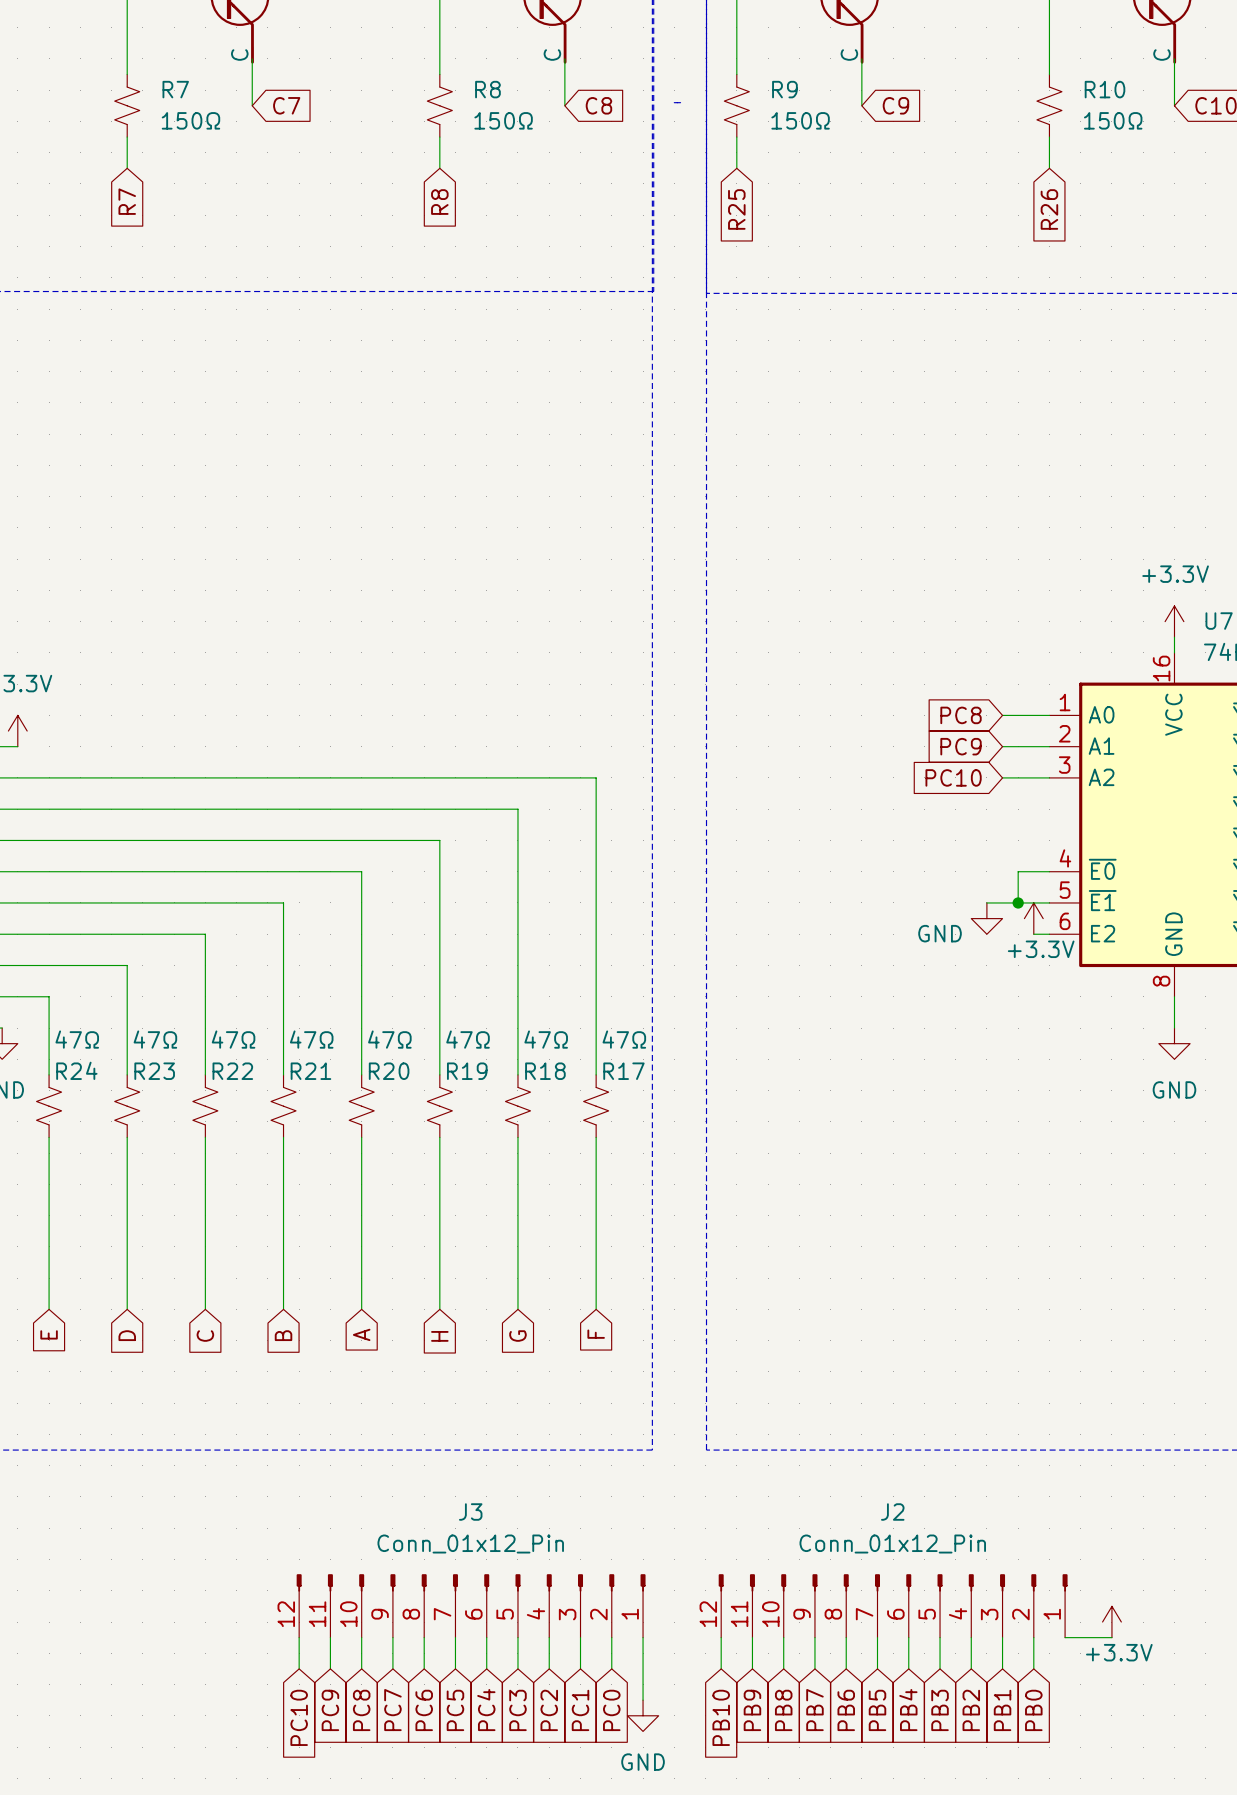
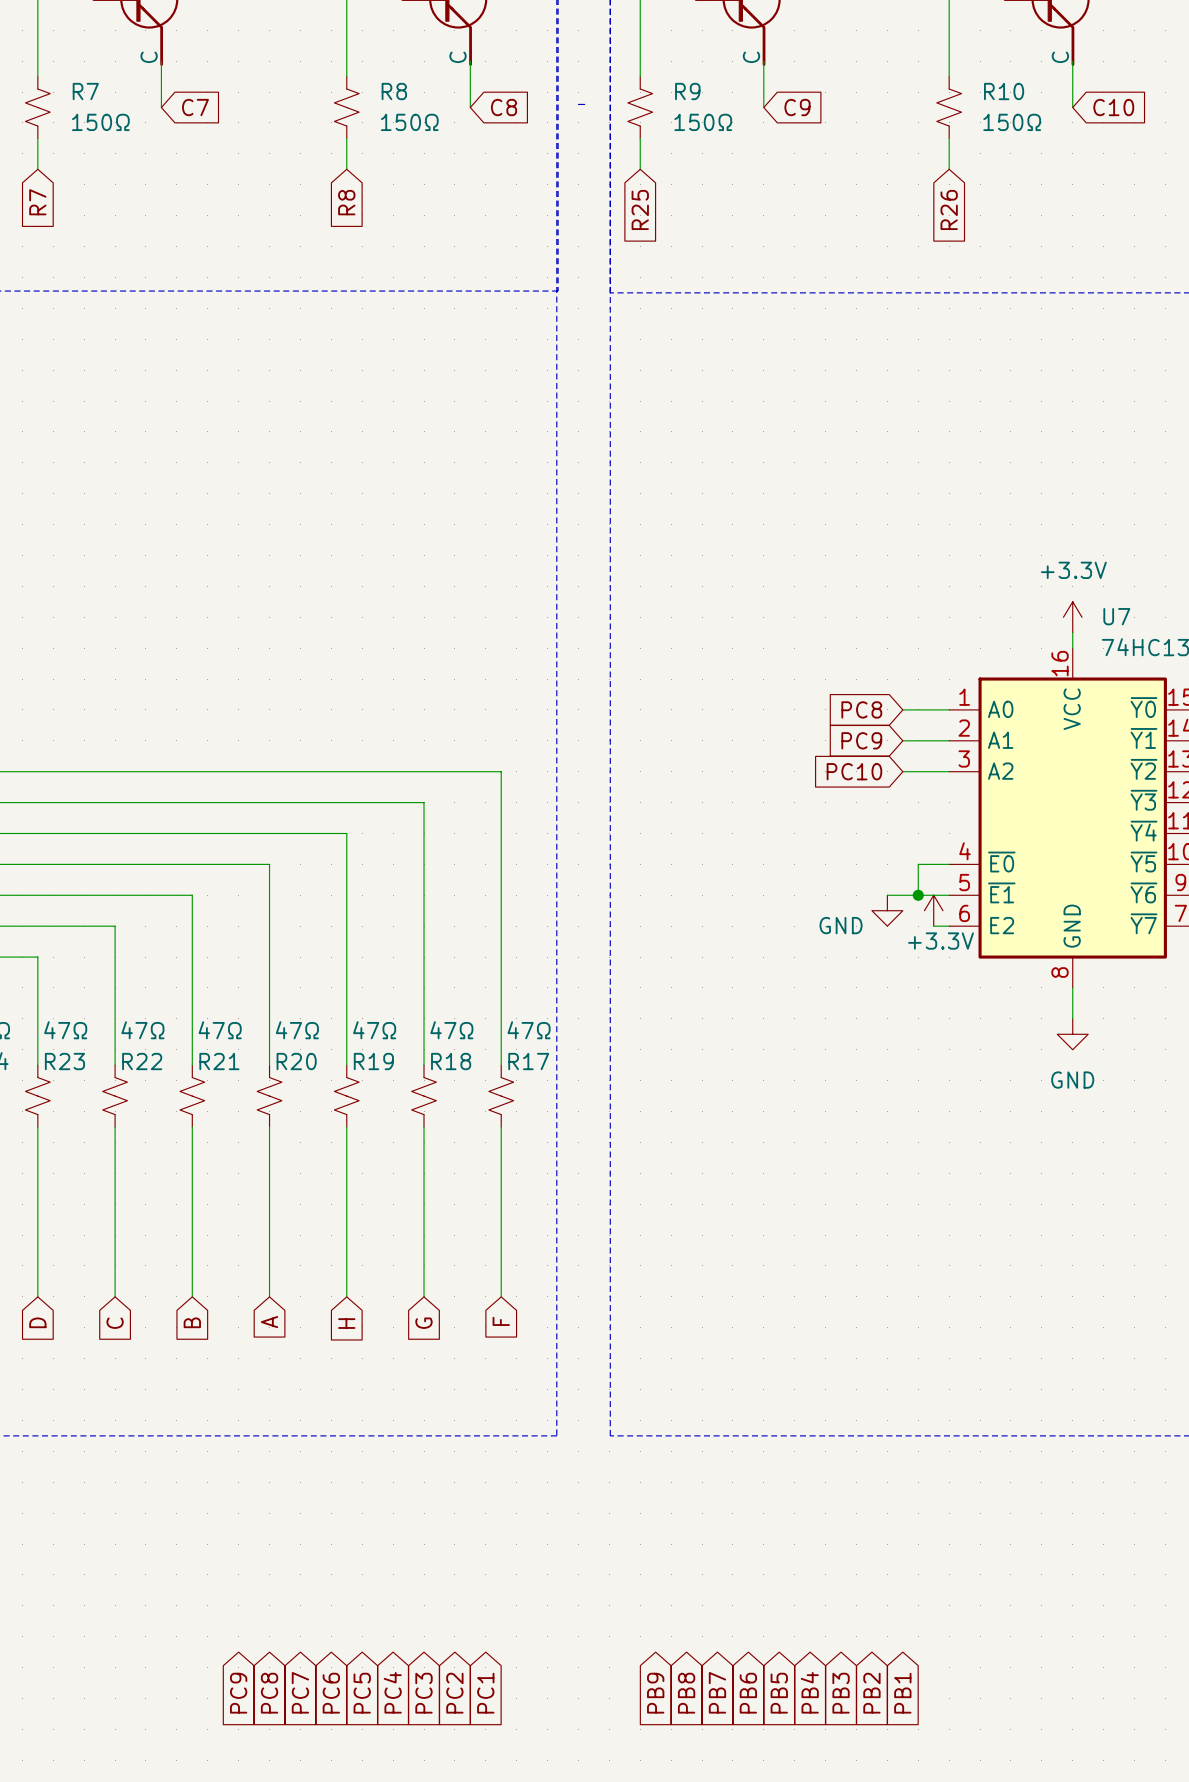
J3: Conn_01x12_Pin (471, 1605) -> none
J2: Conn_01x12_Pin (893, 1605) -> none
power symbol: +3.3V (1111, 1622) -> none
wire: (299, 1637) (299, 1668) -> none
wire: (330, 1637) (330, 1668) -> none
wire: (361, 1637) (361, 1668) -> none
wire: (392, 1637) (392, 1668) -> none
wire: (424, 1637) (424, 1668) -> none
wire: (455, 1637) (455, 1668) -> none
wire: (486, 1637) (486, 1668) -> none
wire: (517, 1637) (517, 1668) -> none
wire: (549, 1637) (549, 1668) -> none
wire: (580, 1637) (580, 1668) -> none
wire: (611, 1637) (611, 1668) -> none
wire: (643, 1637) (643, 1700) -> none
wire: (721, 1637) (721, 1668) -> none
wire: (752, 1637) (752, 1668) -> none
wire: (783, 1637) (783, 1668) -> none
wire: (814, 1637) (814, 1668) -> none
wire: (846, 1637) (846, 1668) -> none
wire: (877, 1637) (877, 1668) -> none
wire: (908, 1637) (908, 1668) -> none
wire: (940, 1637) (940, 1668) -> none
wire: (971, 1637) (971, 1668) -> none
wire: (1002, 1637) (1002, 1668) -> none
wire: (1033, 1637) (1033, 1668) -> none
wire: (1065, 1637) (1111, 1637) -> none
global label: PC0 (611, 1710) -> none
global label: PB0 (1033, 1710) -> none
power symbol: GND (643, 1715) -> none
global label: PC10 (299, 1717) -> none
global label: PB10 (721, 1717) -> none

